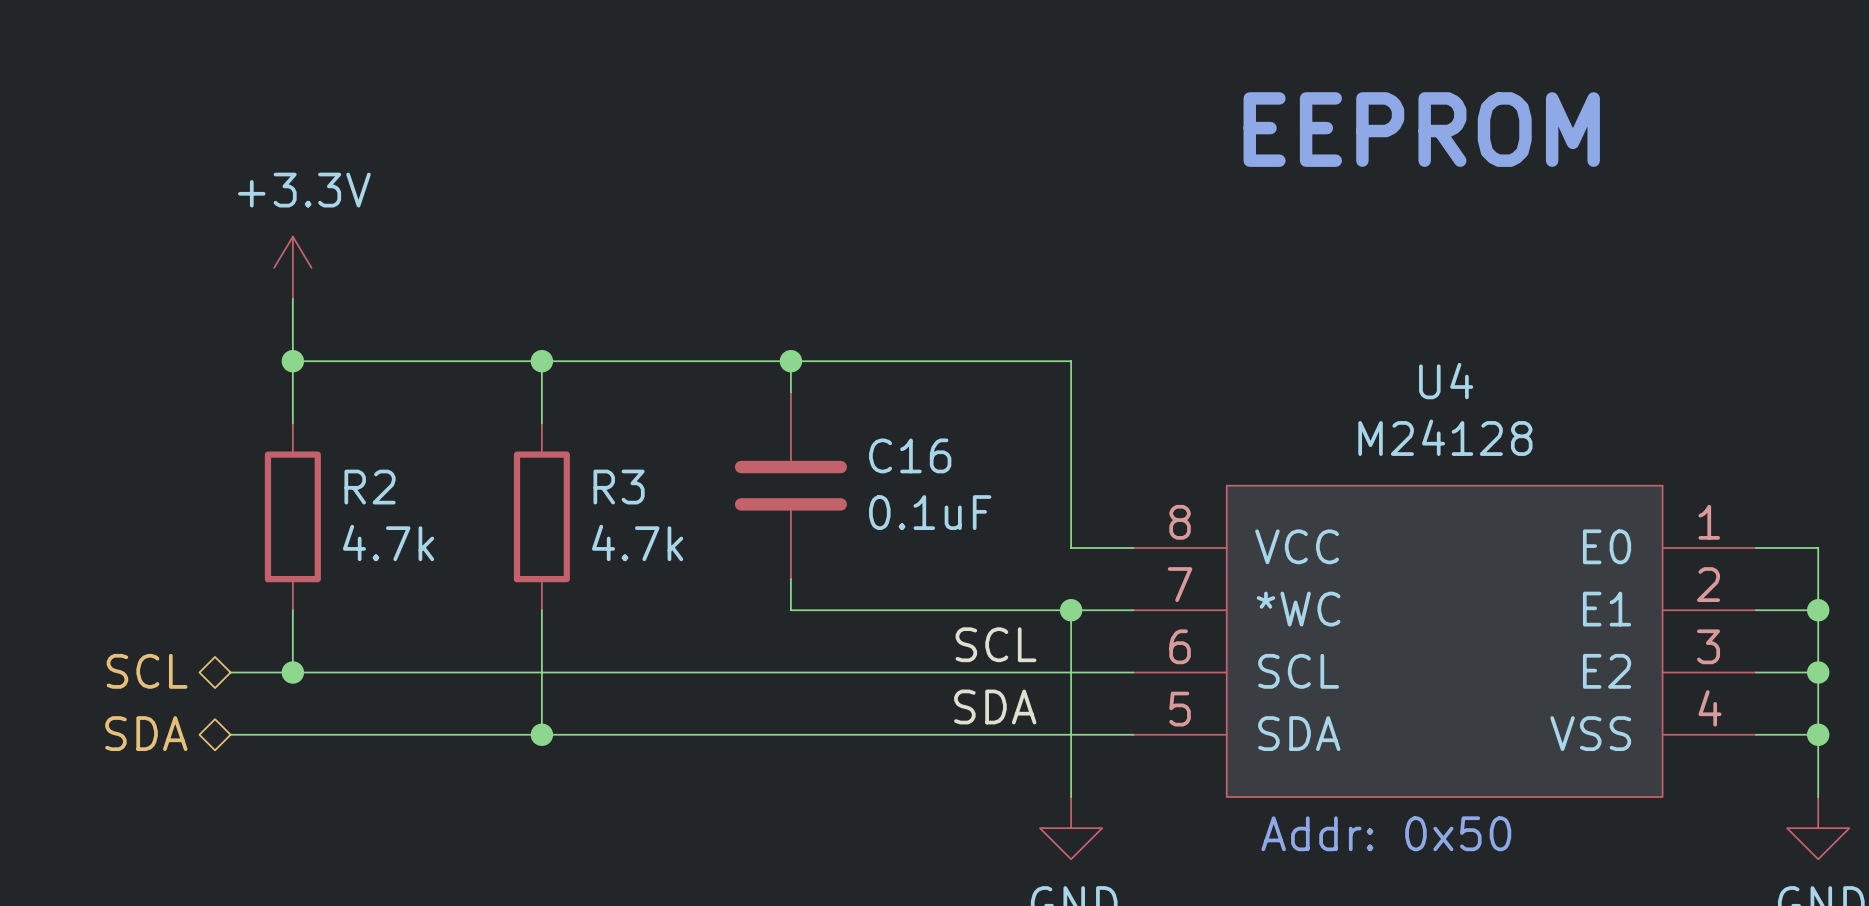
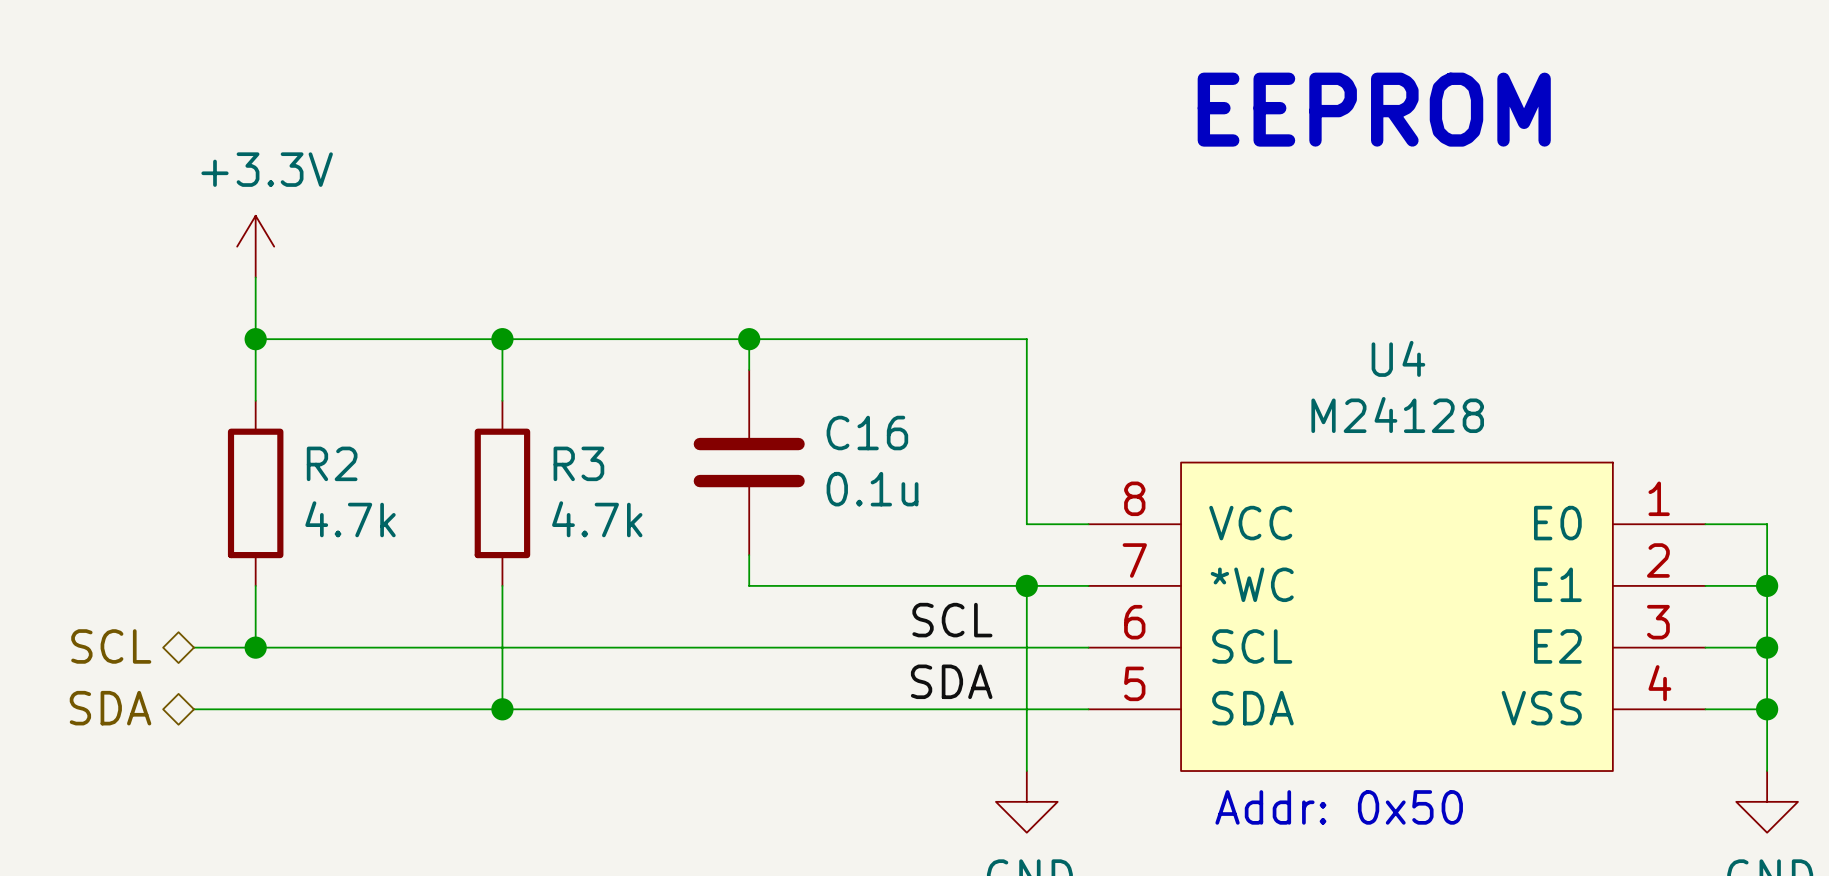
C16 value: 0.1uF (930, 512) -> 0.1u (872, 489)

